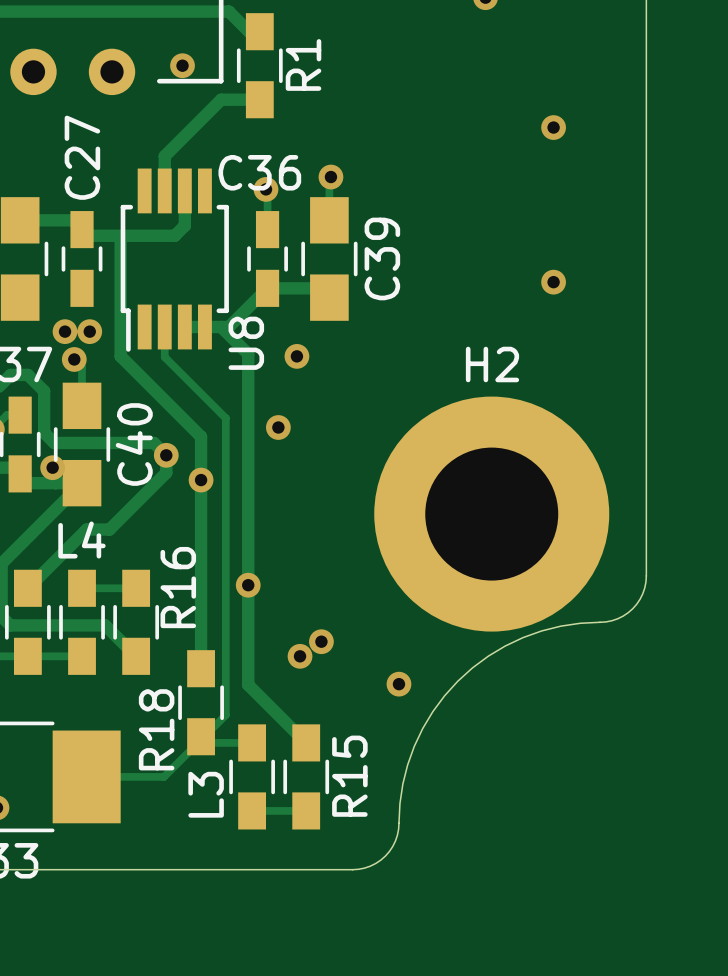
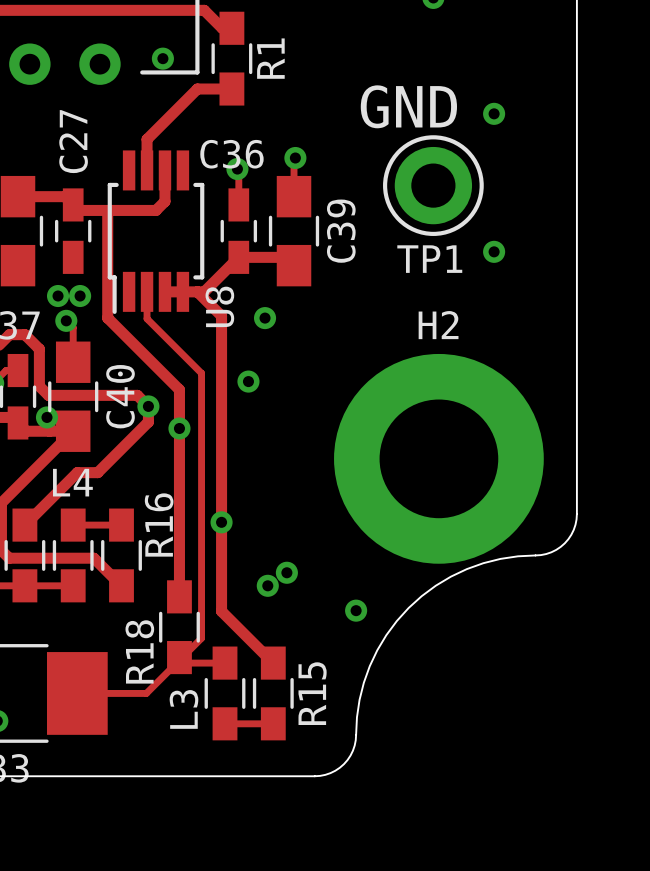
text: none -> GND (408, 106)
TP1: none -> (433, 185)

